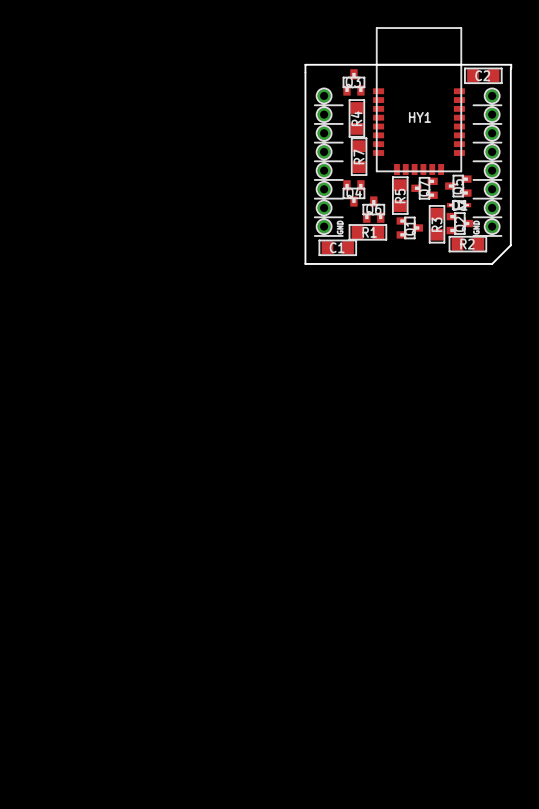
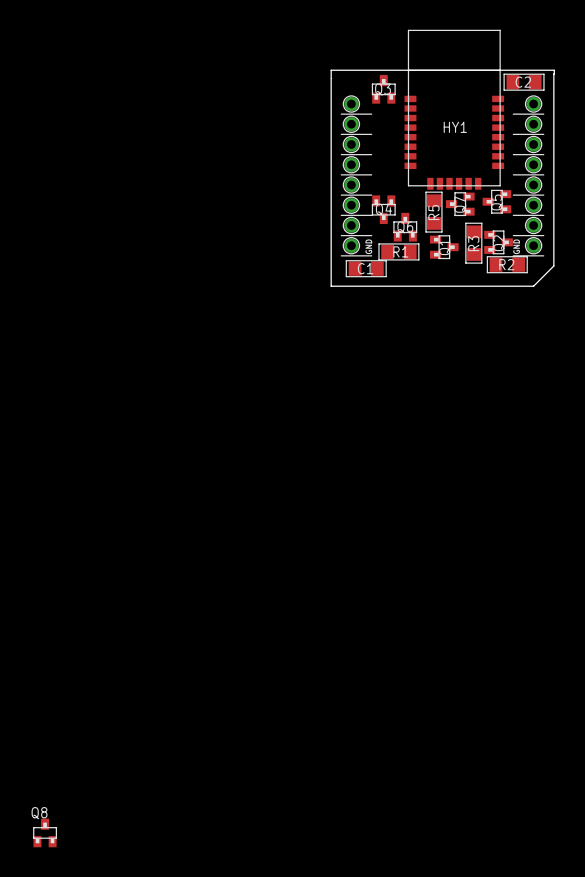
R4: (356, 118) -> none
R7: (359, 156) -> none
part: (459, 205) -> none
Q8: none -> (45, 832)

